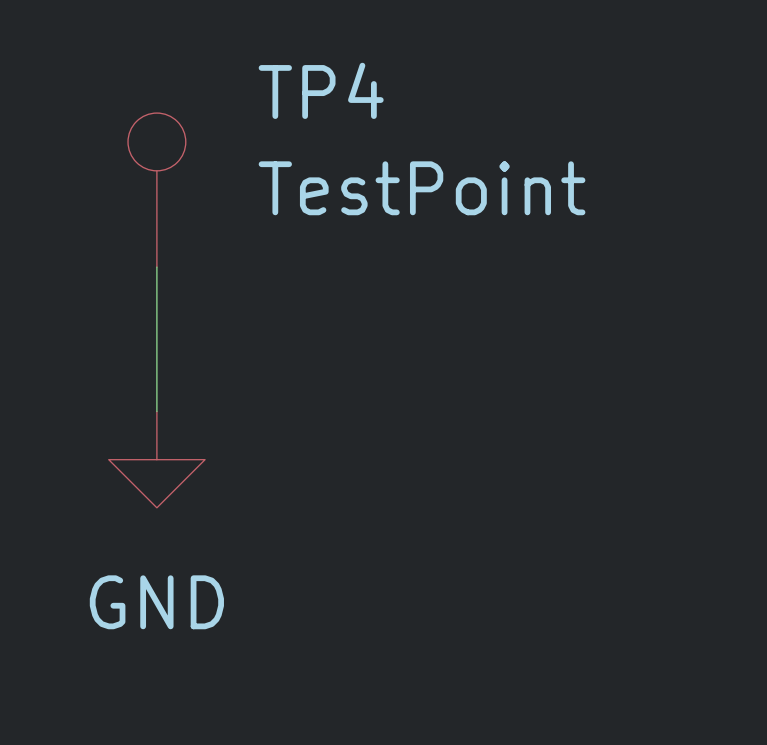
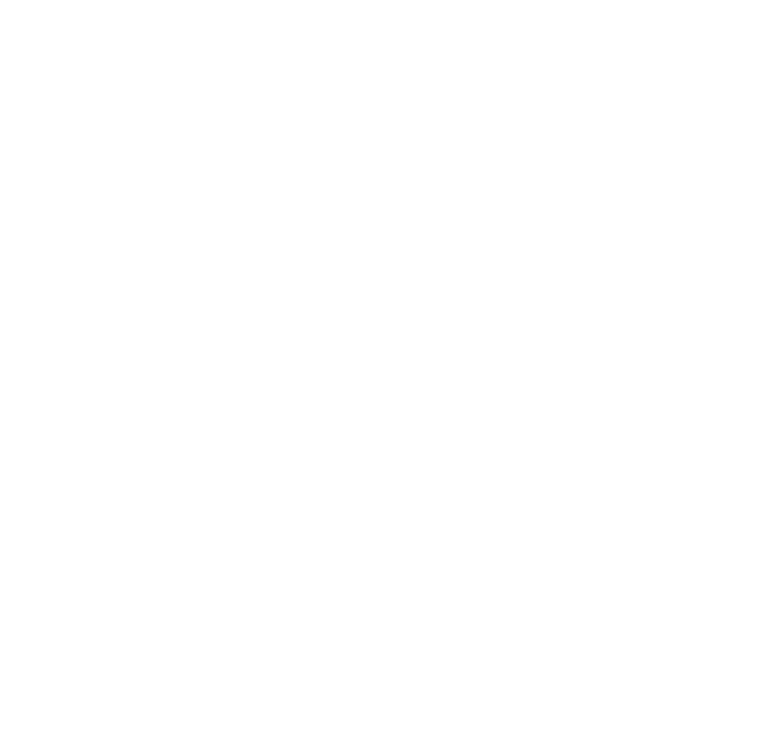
TP4: TestPoint (156, 190) -> none
wire: (156, 267) (156, 411) -> none
power symbol: GND (156, 459) -> none

